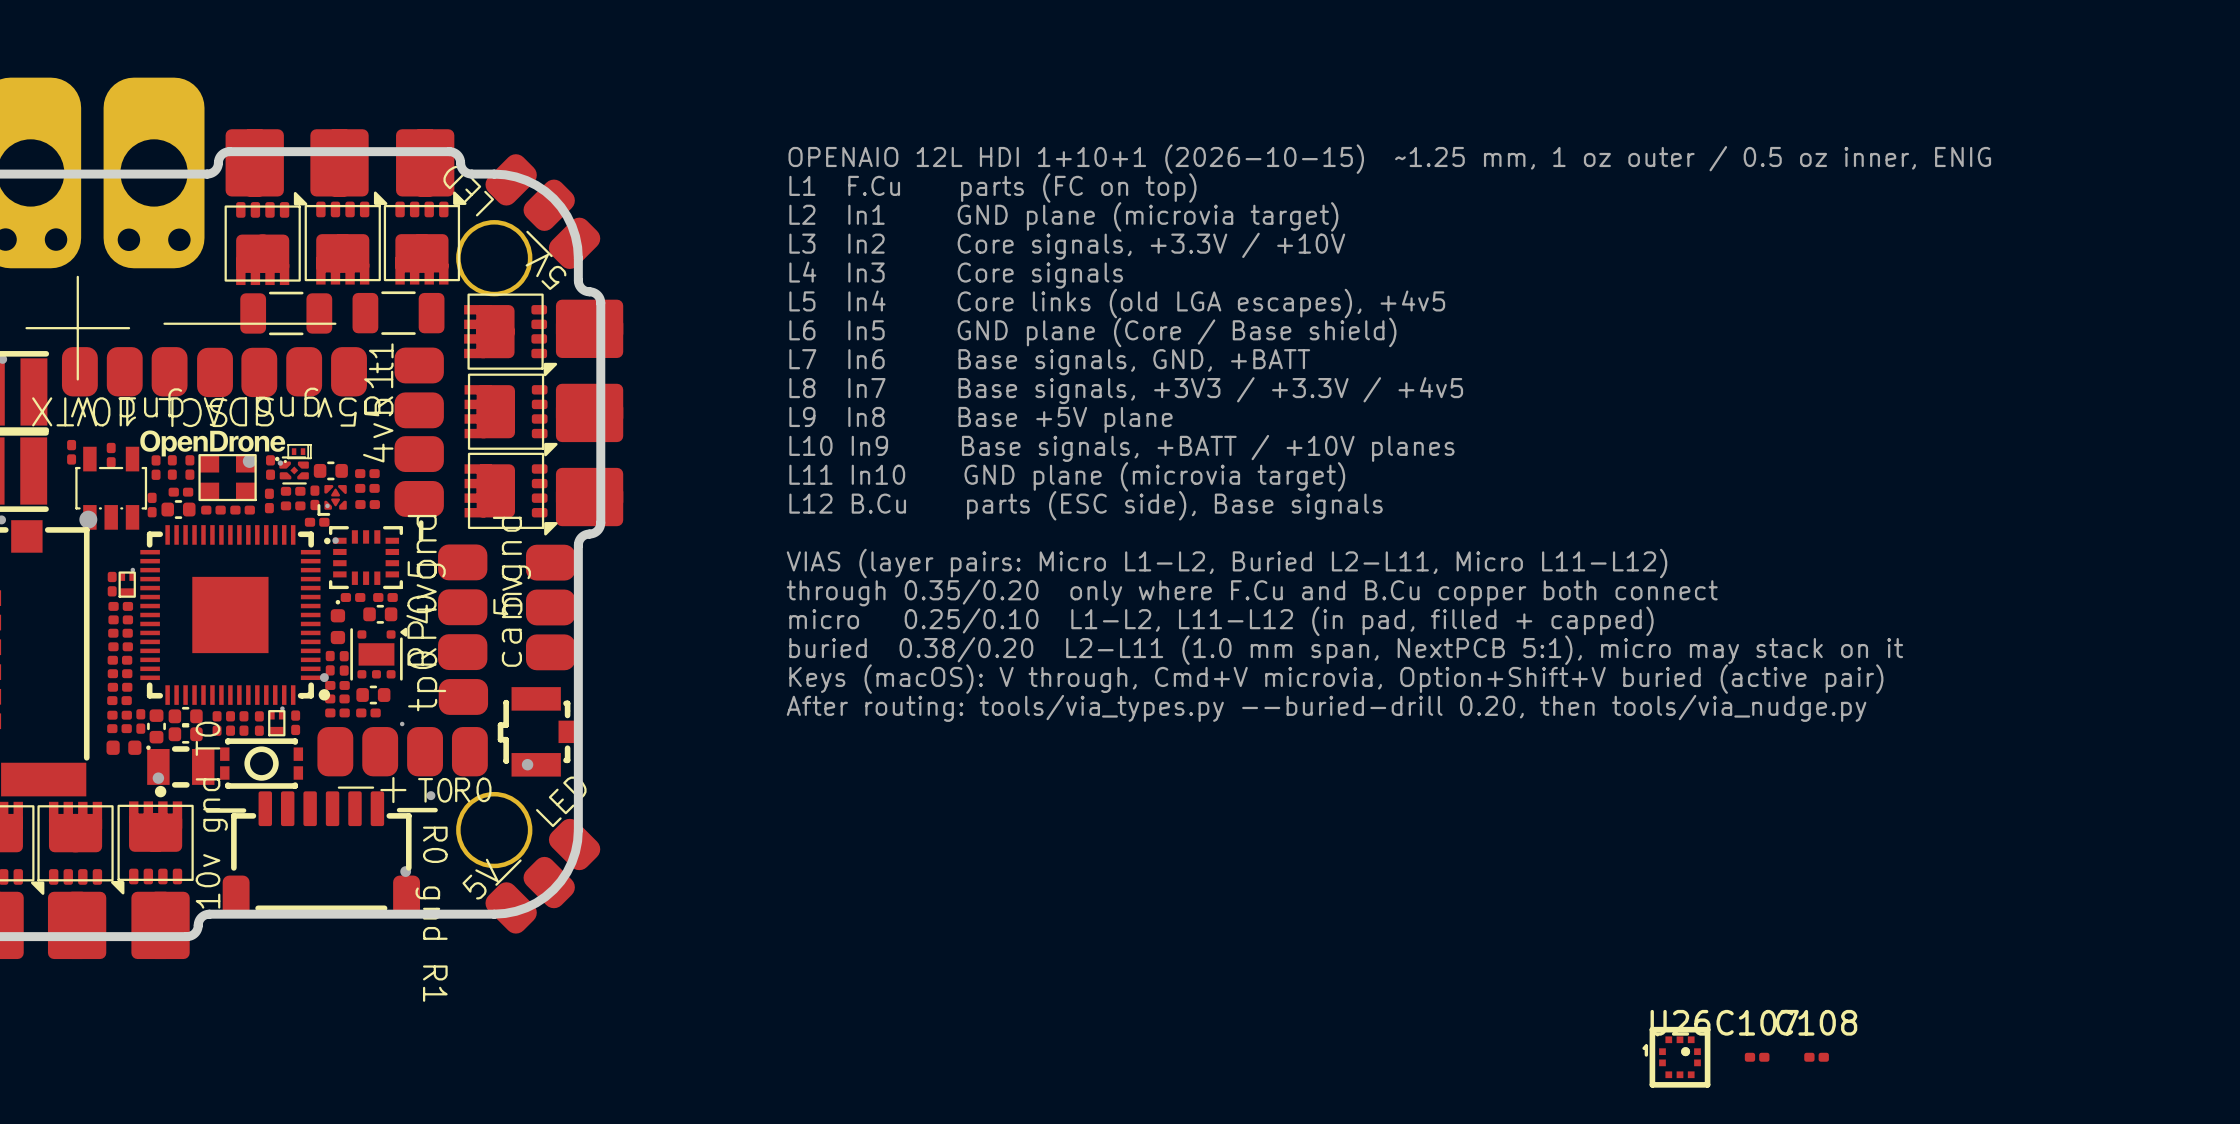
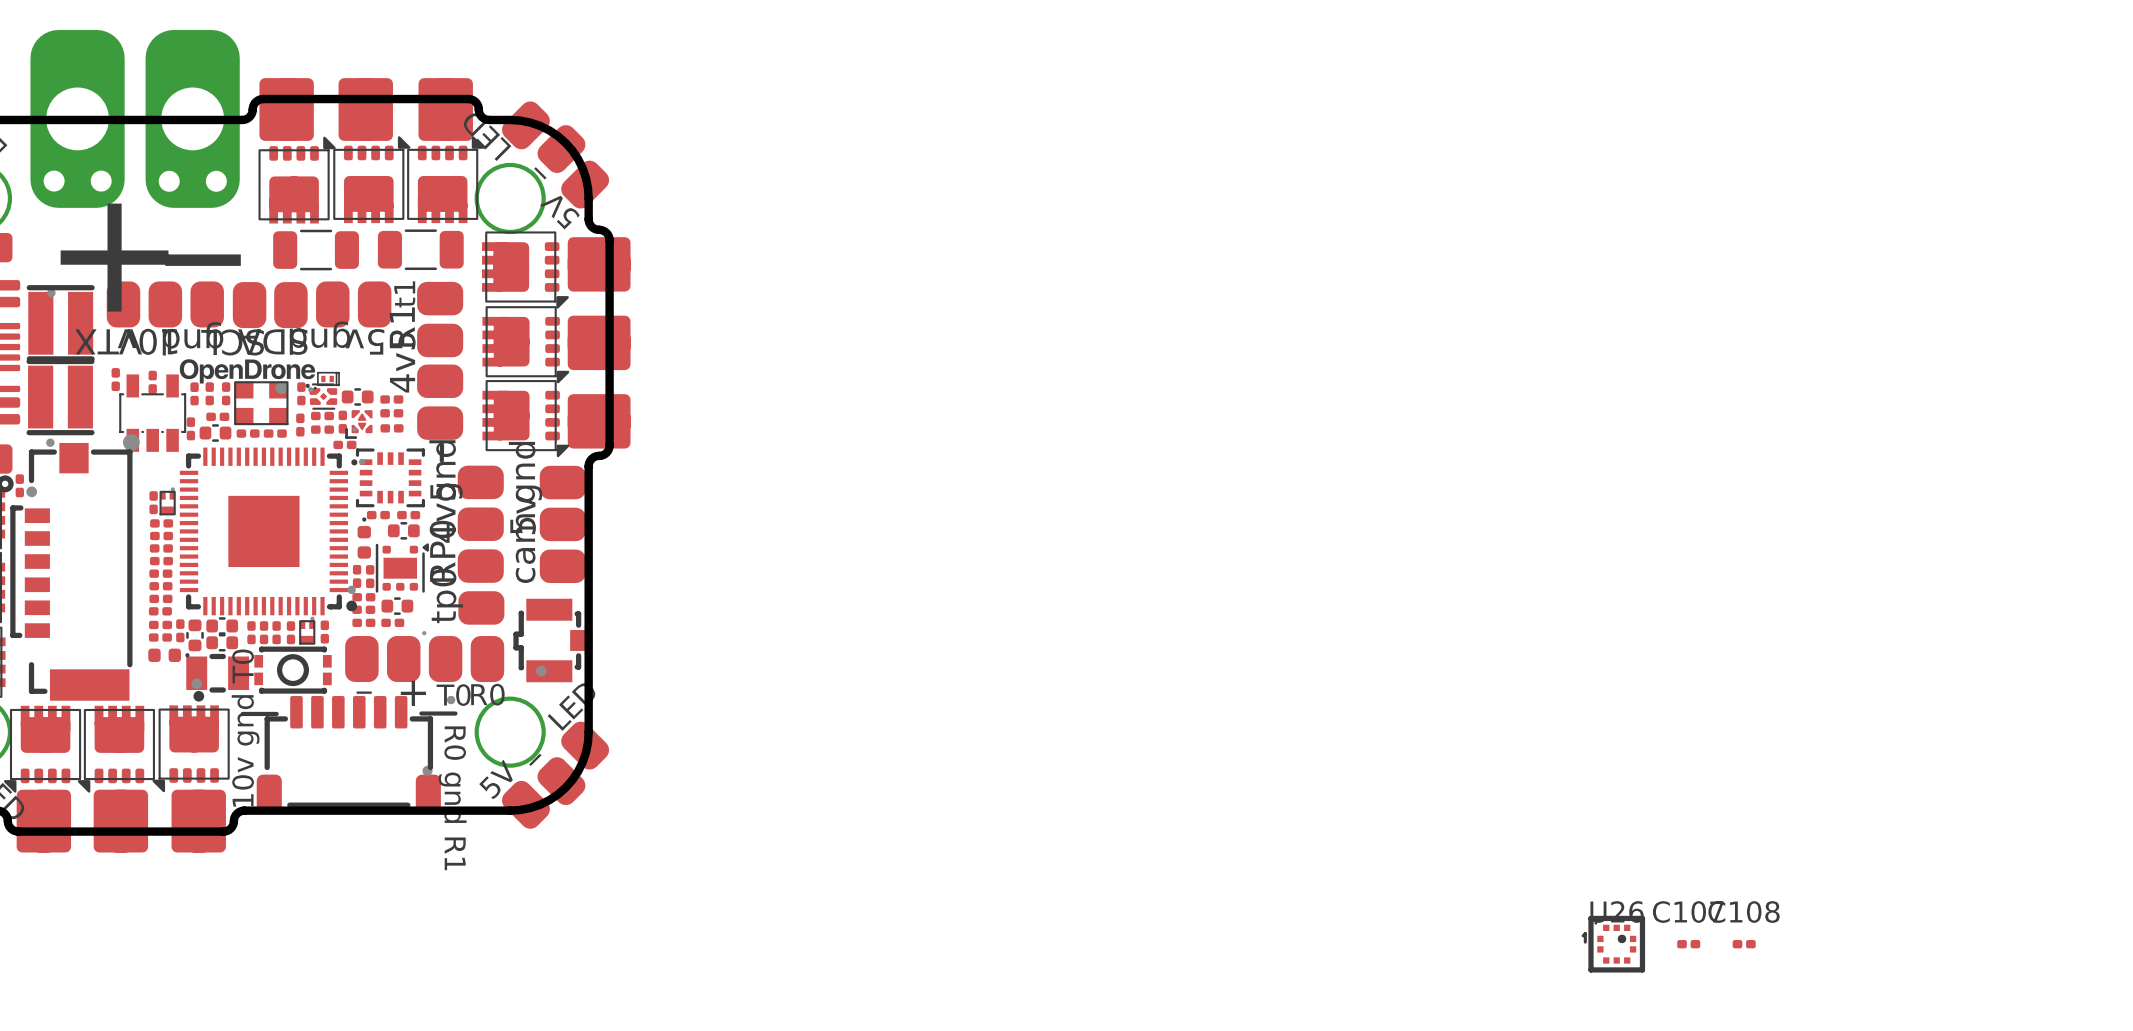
text: OPENAIO 12L HDI 1+10+1 (2026-10-15) ~1.25 mm, 1 oz outer / 0.5 oz inner, ENIG (1389, 159) -> none
text: L1 F.Cu parts (FC on top) (992, 188) -> none
text: L2 In1 GND plane (microvia target) (1063, 216) -> none
text: L3 In2 Core signals, +3.3V / +10V (1067, 246) -> none
text: L4 In3 Core signals (956, 275) -> none
text: L5 In4 Core links (old LGA escapes), +4v5 (1117, 303) -> none
text: L6 In5 GND plane (Core / Base shield) (1092, 332) -> none
text: L7 In6 Base signals, GND, +BATT (1049, 362) -> none
text: L8 In7 Base signals, +3V3 / +3.3V / +4v5 (1126, 390) -> none
text: L9 In8 Base +5V plane (980, 419) -> none
text: L10 In9 Base signals, +BATT / +10V planes (1121, 448) -> none
text: L11 In10 GND plane (microvia target) (1067, 476) -> none
text: L12 B.Cu parts (ESC side), Base signals (1086, 505) -> none
text: VIAS (layer pairs: Micro L1-L2, Buried L2-L11, Micro L11-L12) (1227, 563) -> none
text: through 0.35/0.20 only where F.Cu and B.Cu copper both connect (1252, 592) -> none
text: micro 0.25/0.10 L1-L2, L11-L12 (in pad, filled + capped) (1221, 621) -> none
text: buried 0.38/0.20 L2-L11 (1.0 mm span, NextPCB 5:1), micro may stack on it (1346, 650) -> none
text: Keys (macOS): V through, Cmd+V microvia, Option+Shift+V buried (active pair) (1336, 679) -> none
text: After routing: tools/via_types.py --buried-drill 0.20, then tools/via_nudge.py (1326, 708) -> none

